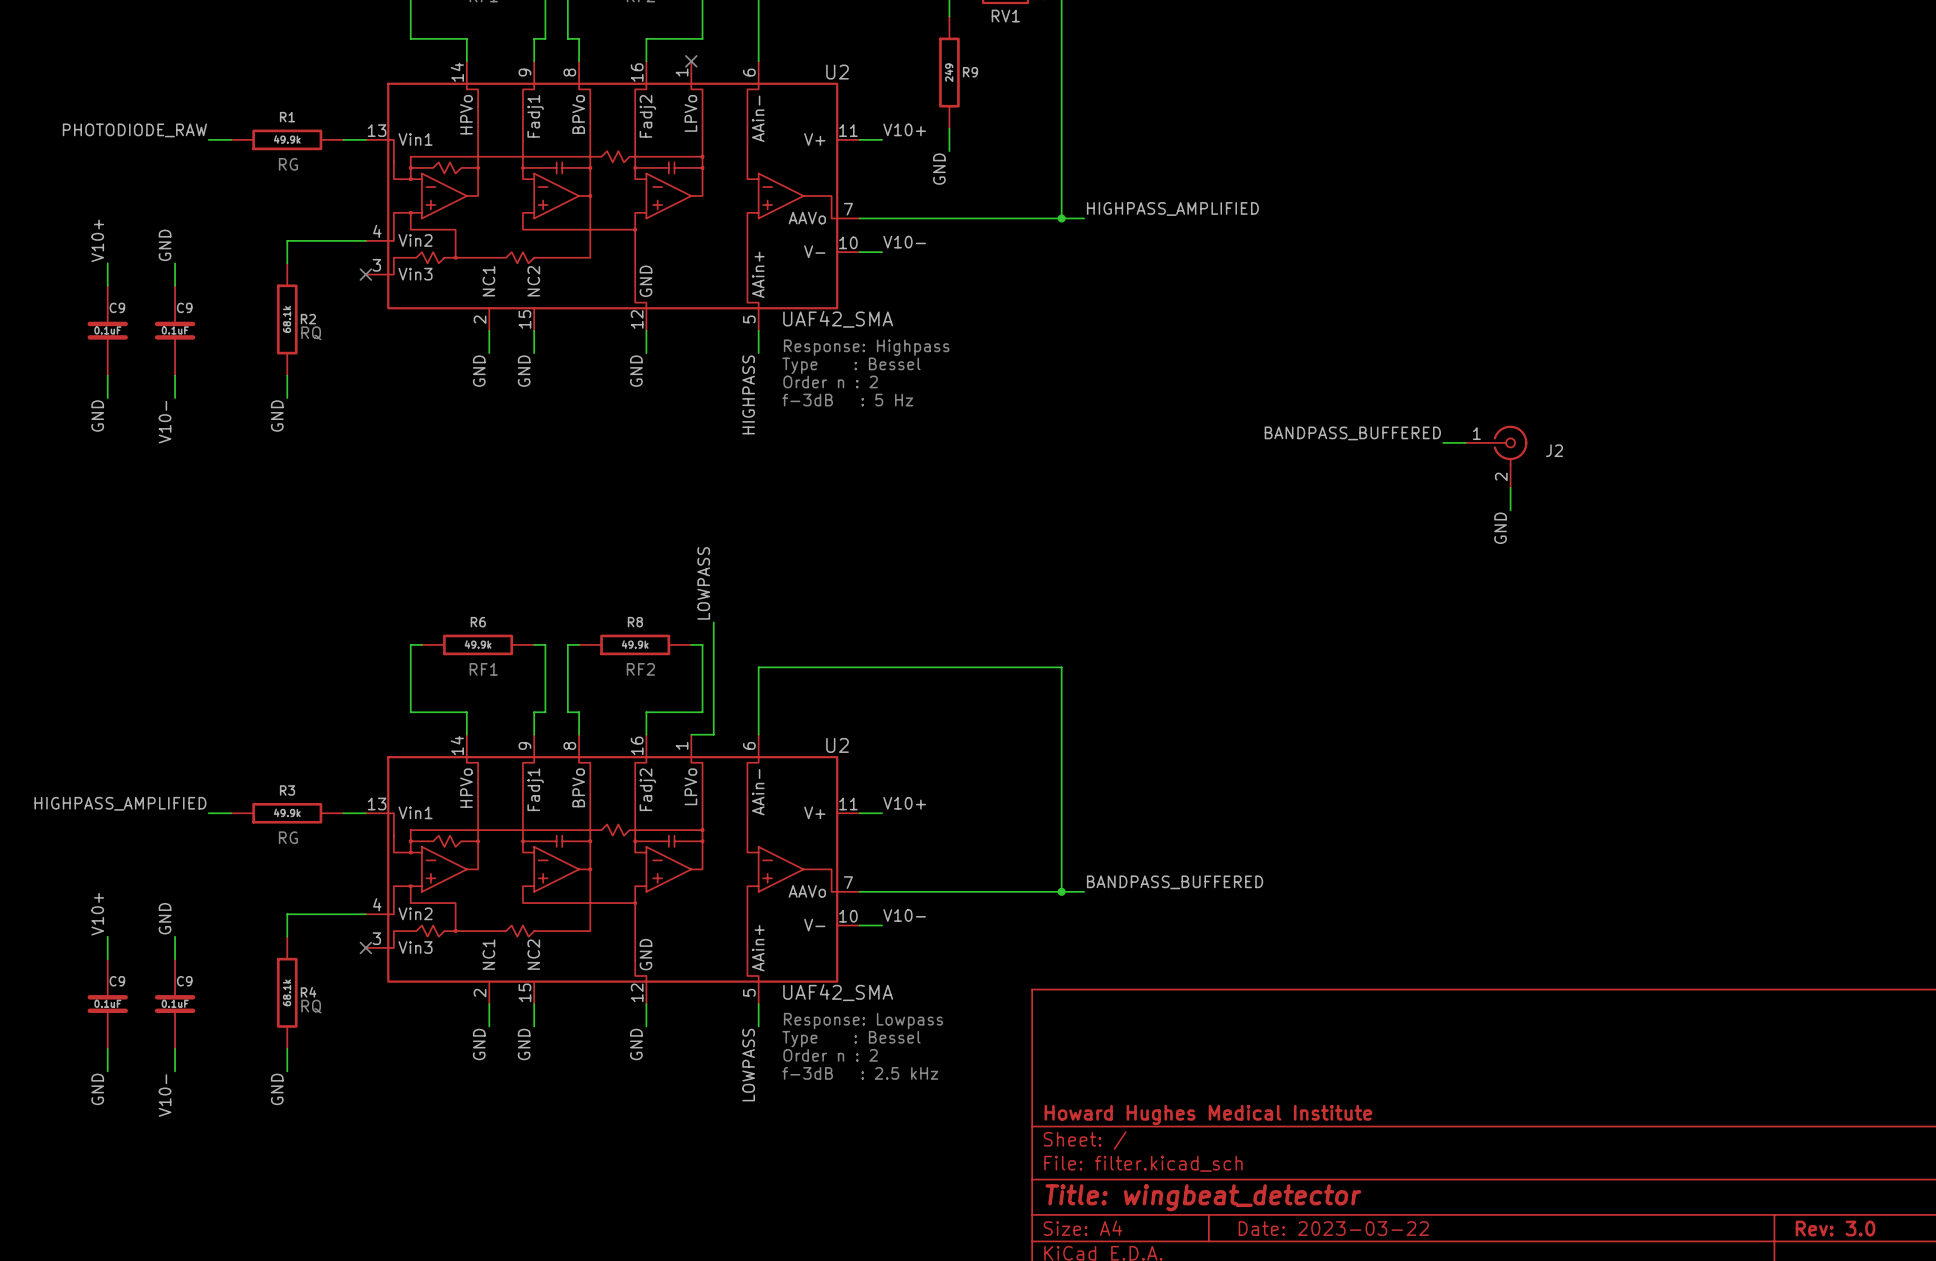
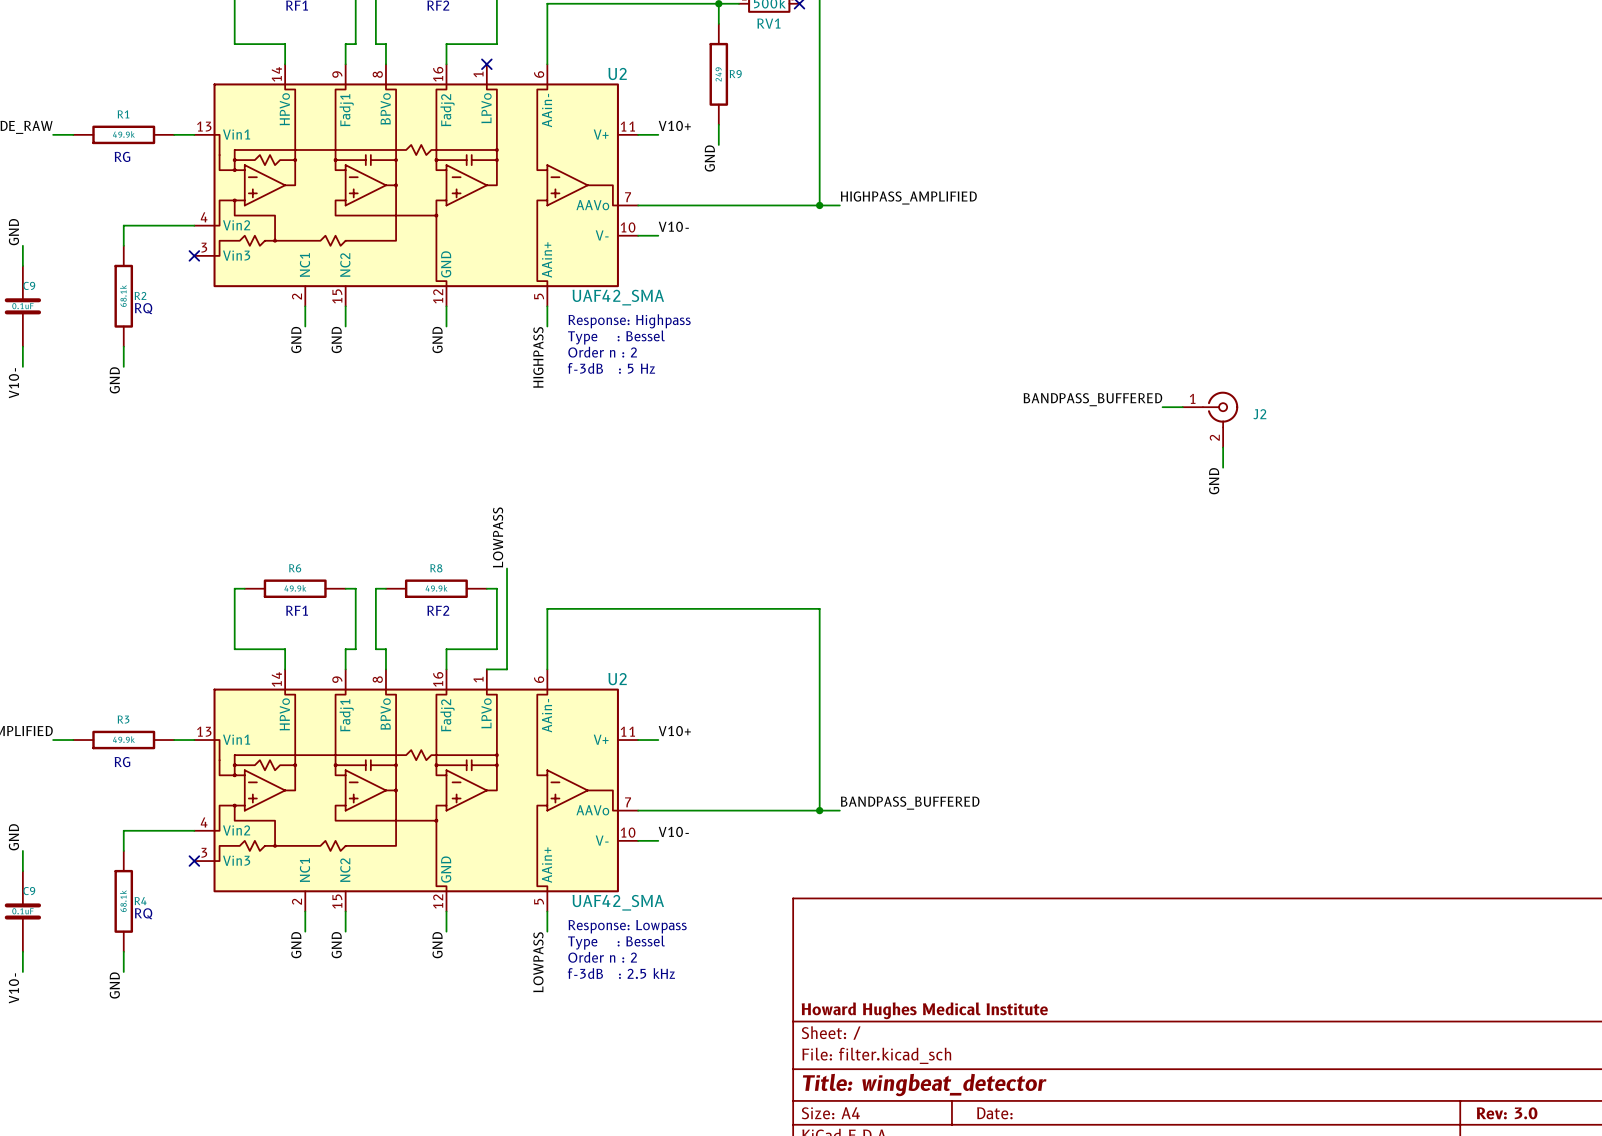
title block: Date: 2023-03-22 (1333, 1228) -> Date: (994, 1113)

